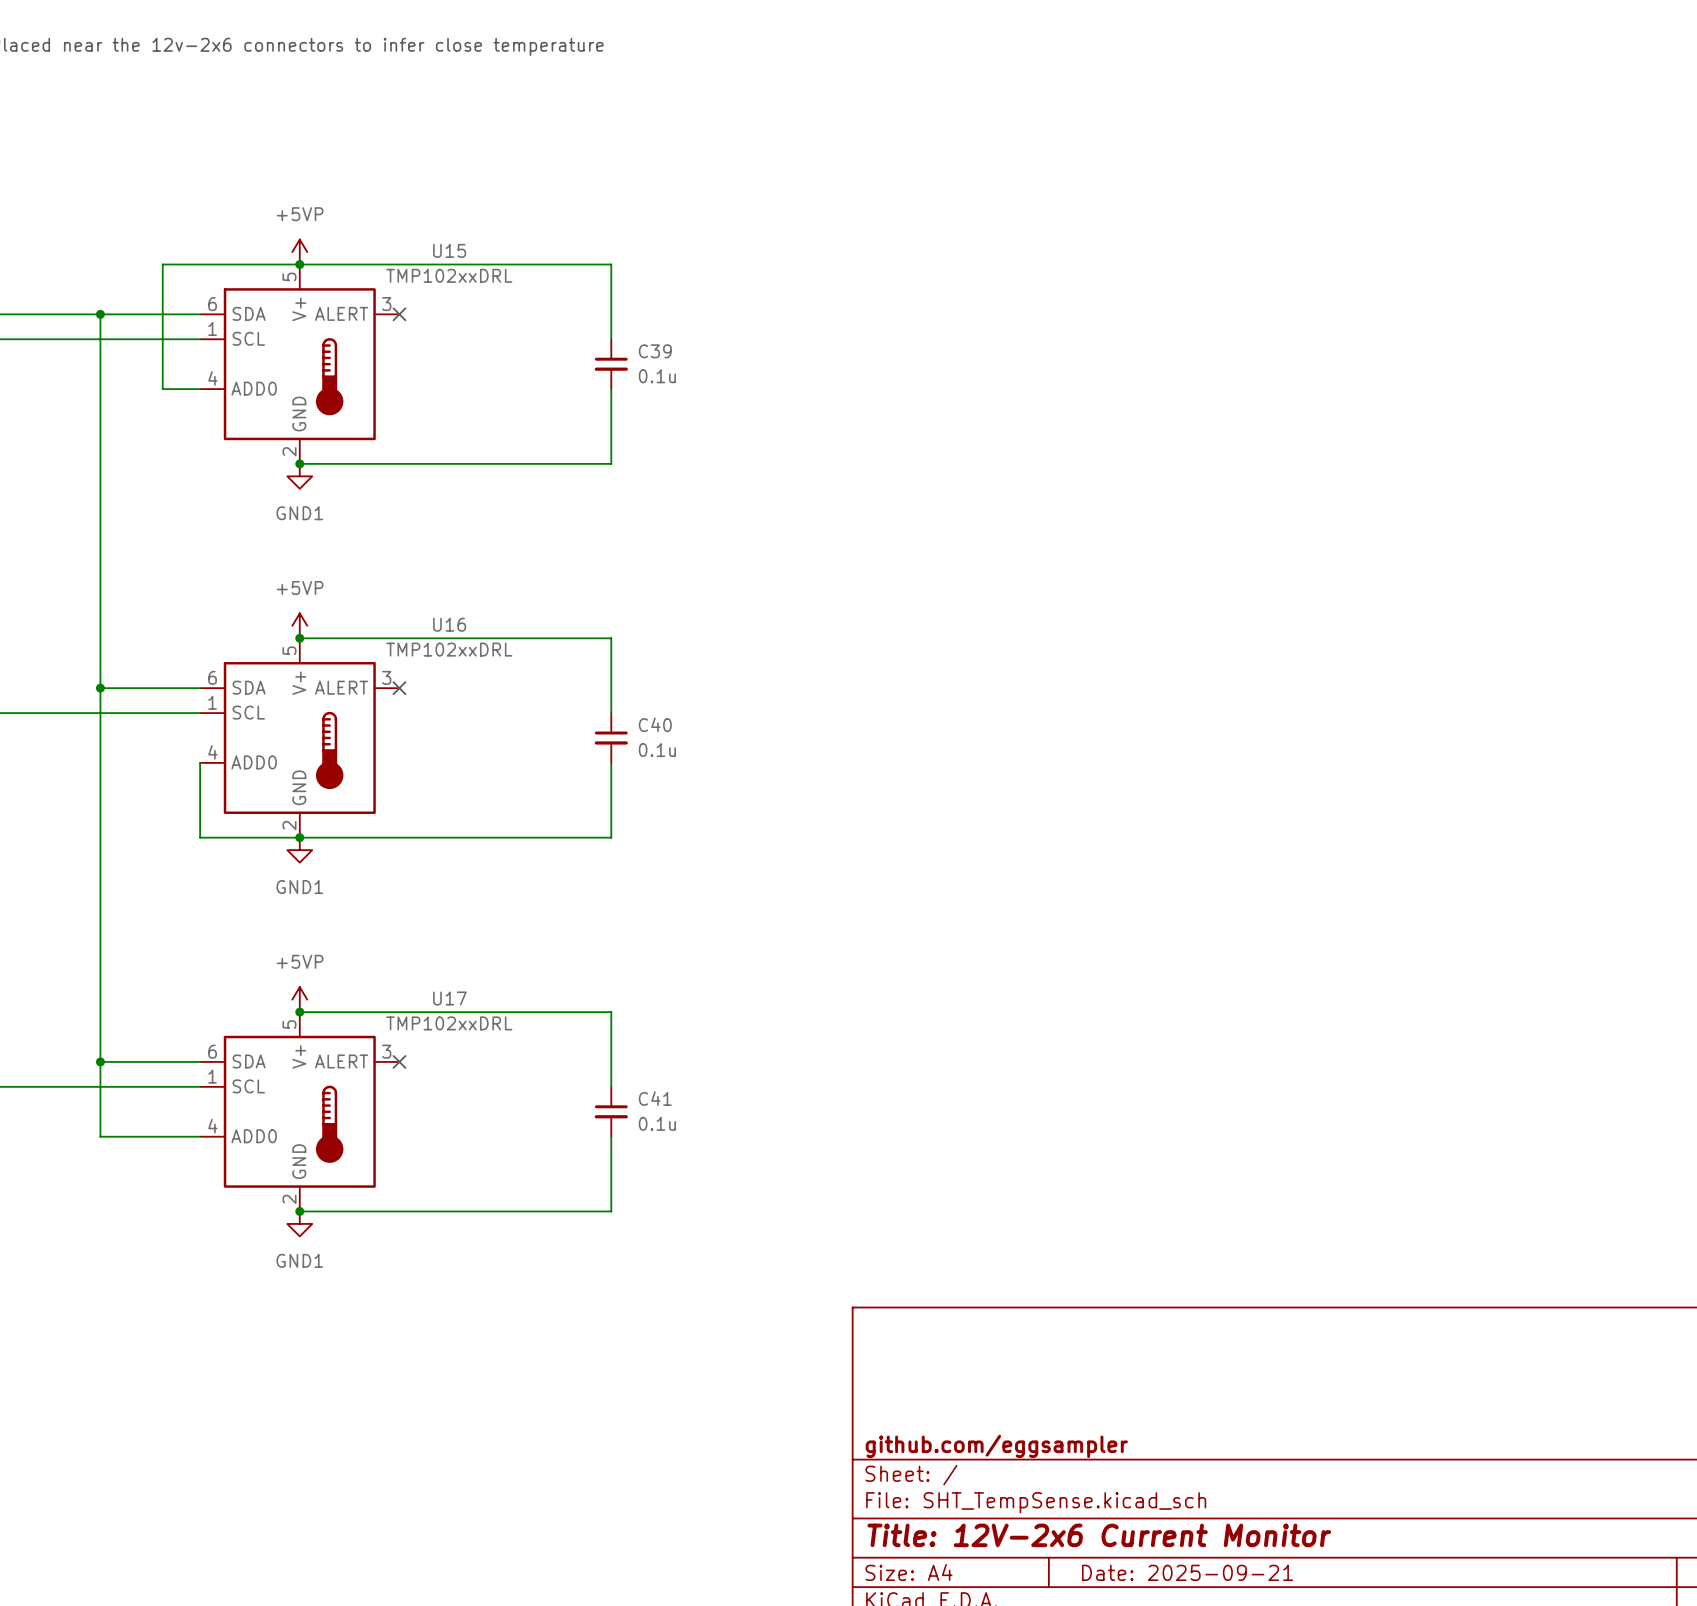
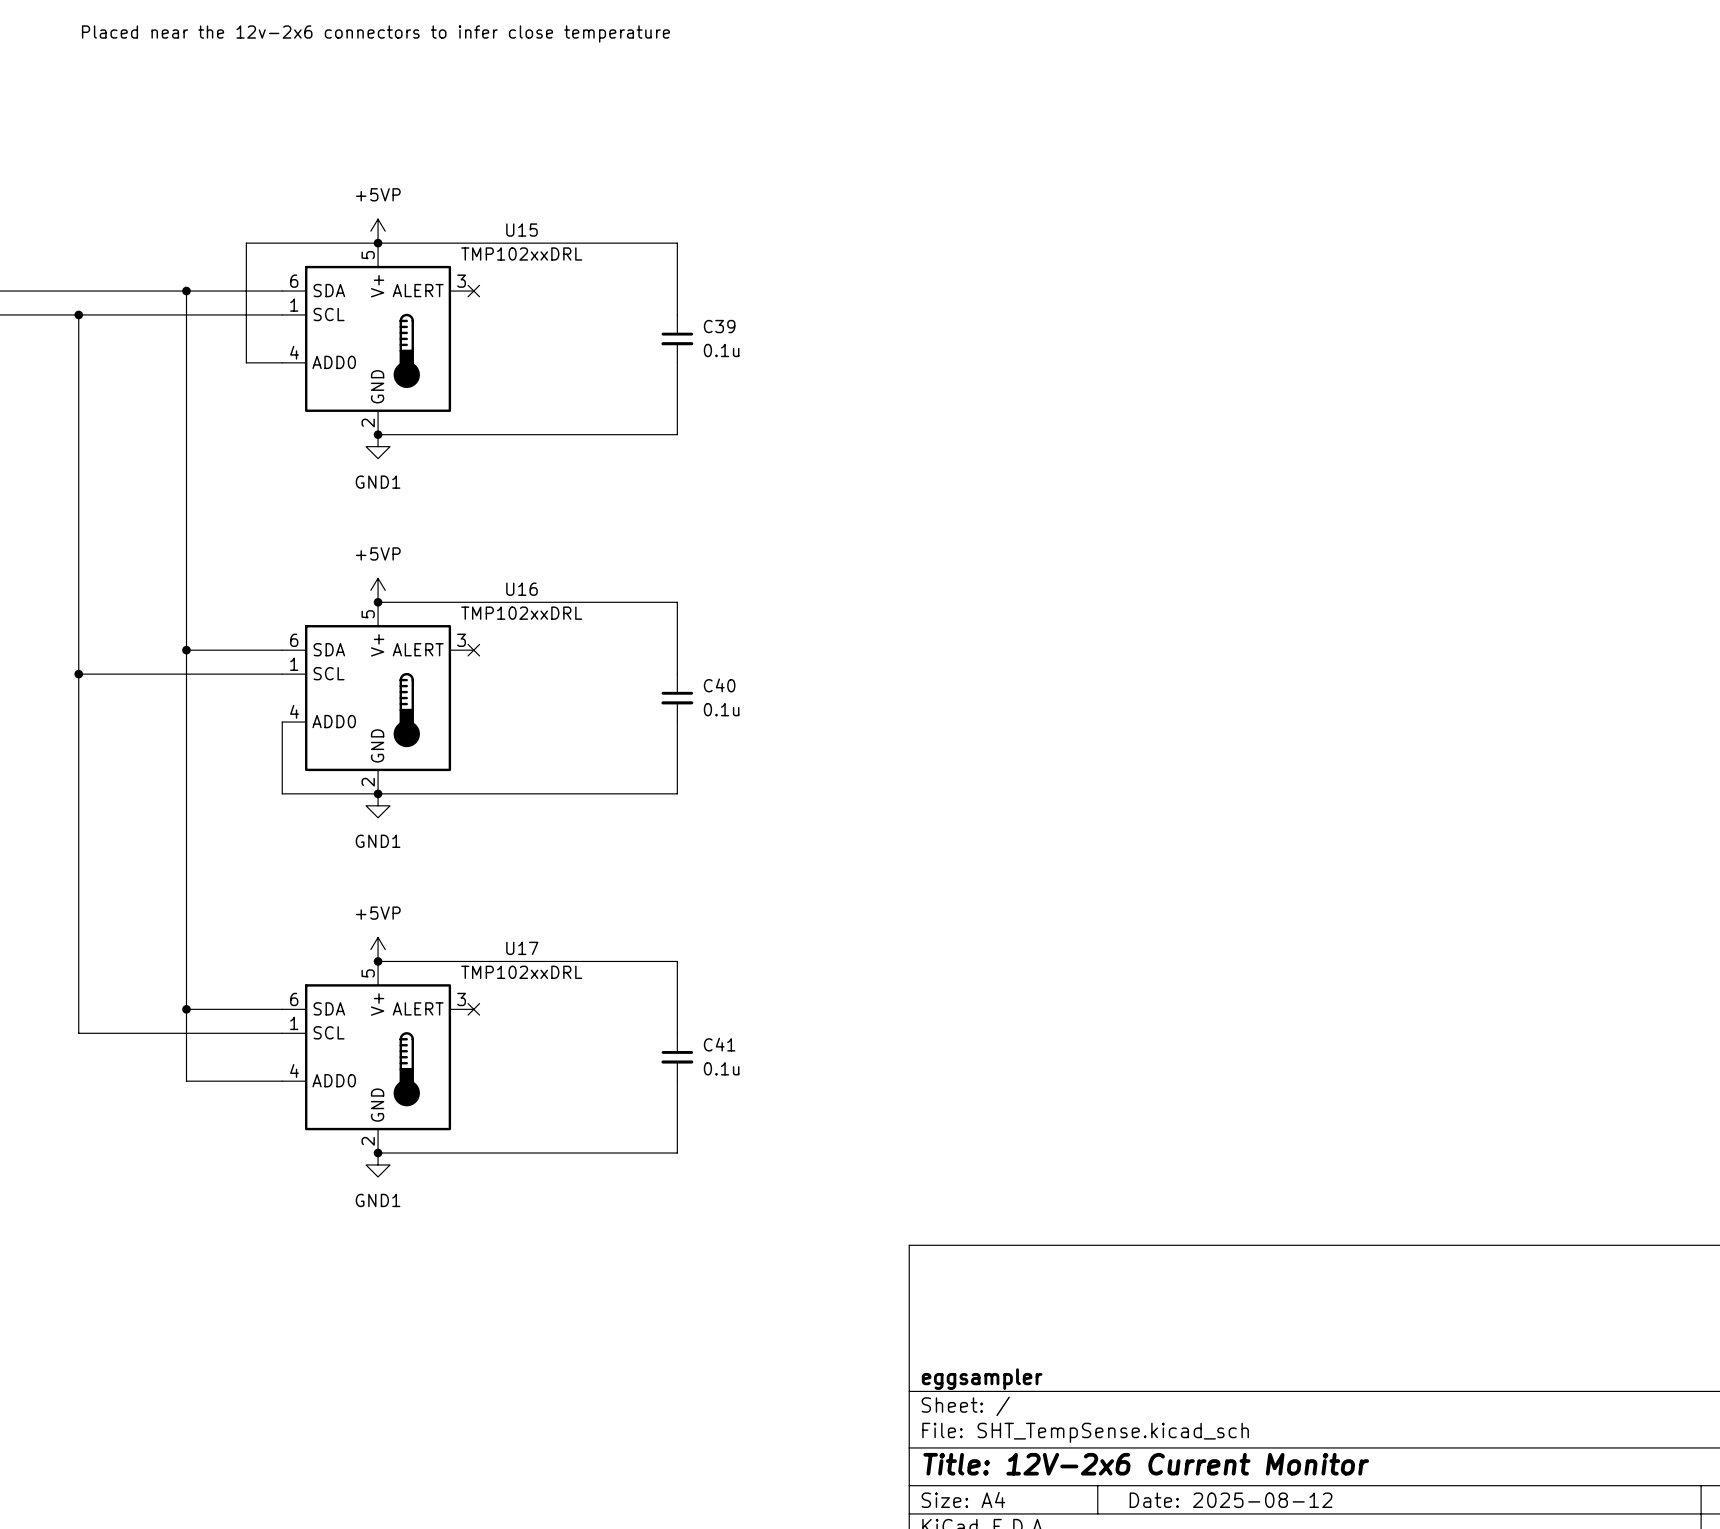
title block: github.com/eggsampler (996, 1446) -> eggsampler (982, 1379)
title block: Date: 2025-09-21 (1187, 1572) -> Date: 2025-08-12 (1231, 1500)

